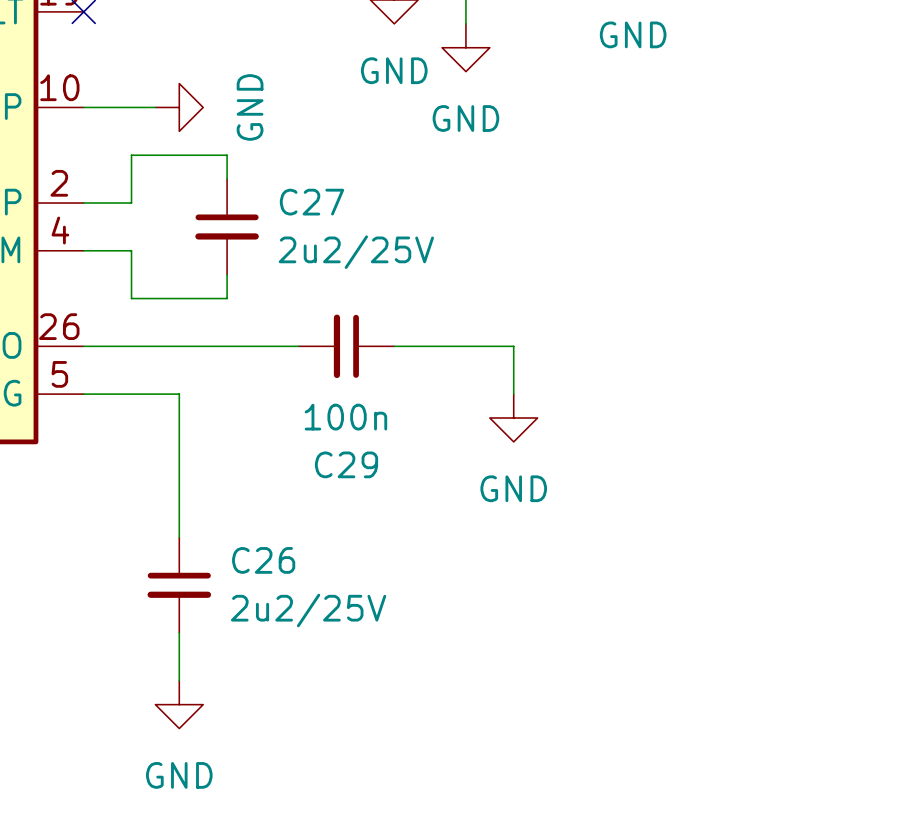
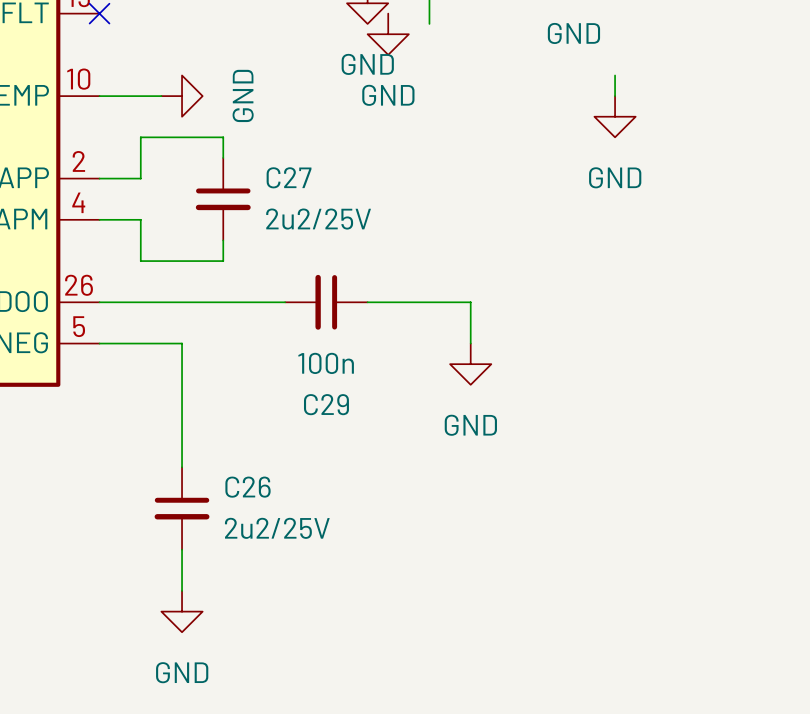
power symbol position: GND (465, 47) -> GND (388, 34)
wire: none -> (615, 75) (615, 96)
power symbol: none -> GND (615, 116)

